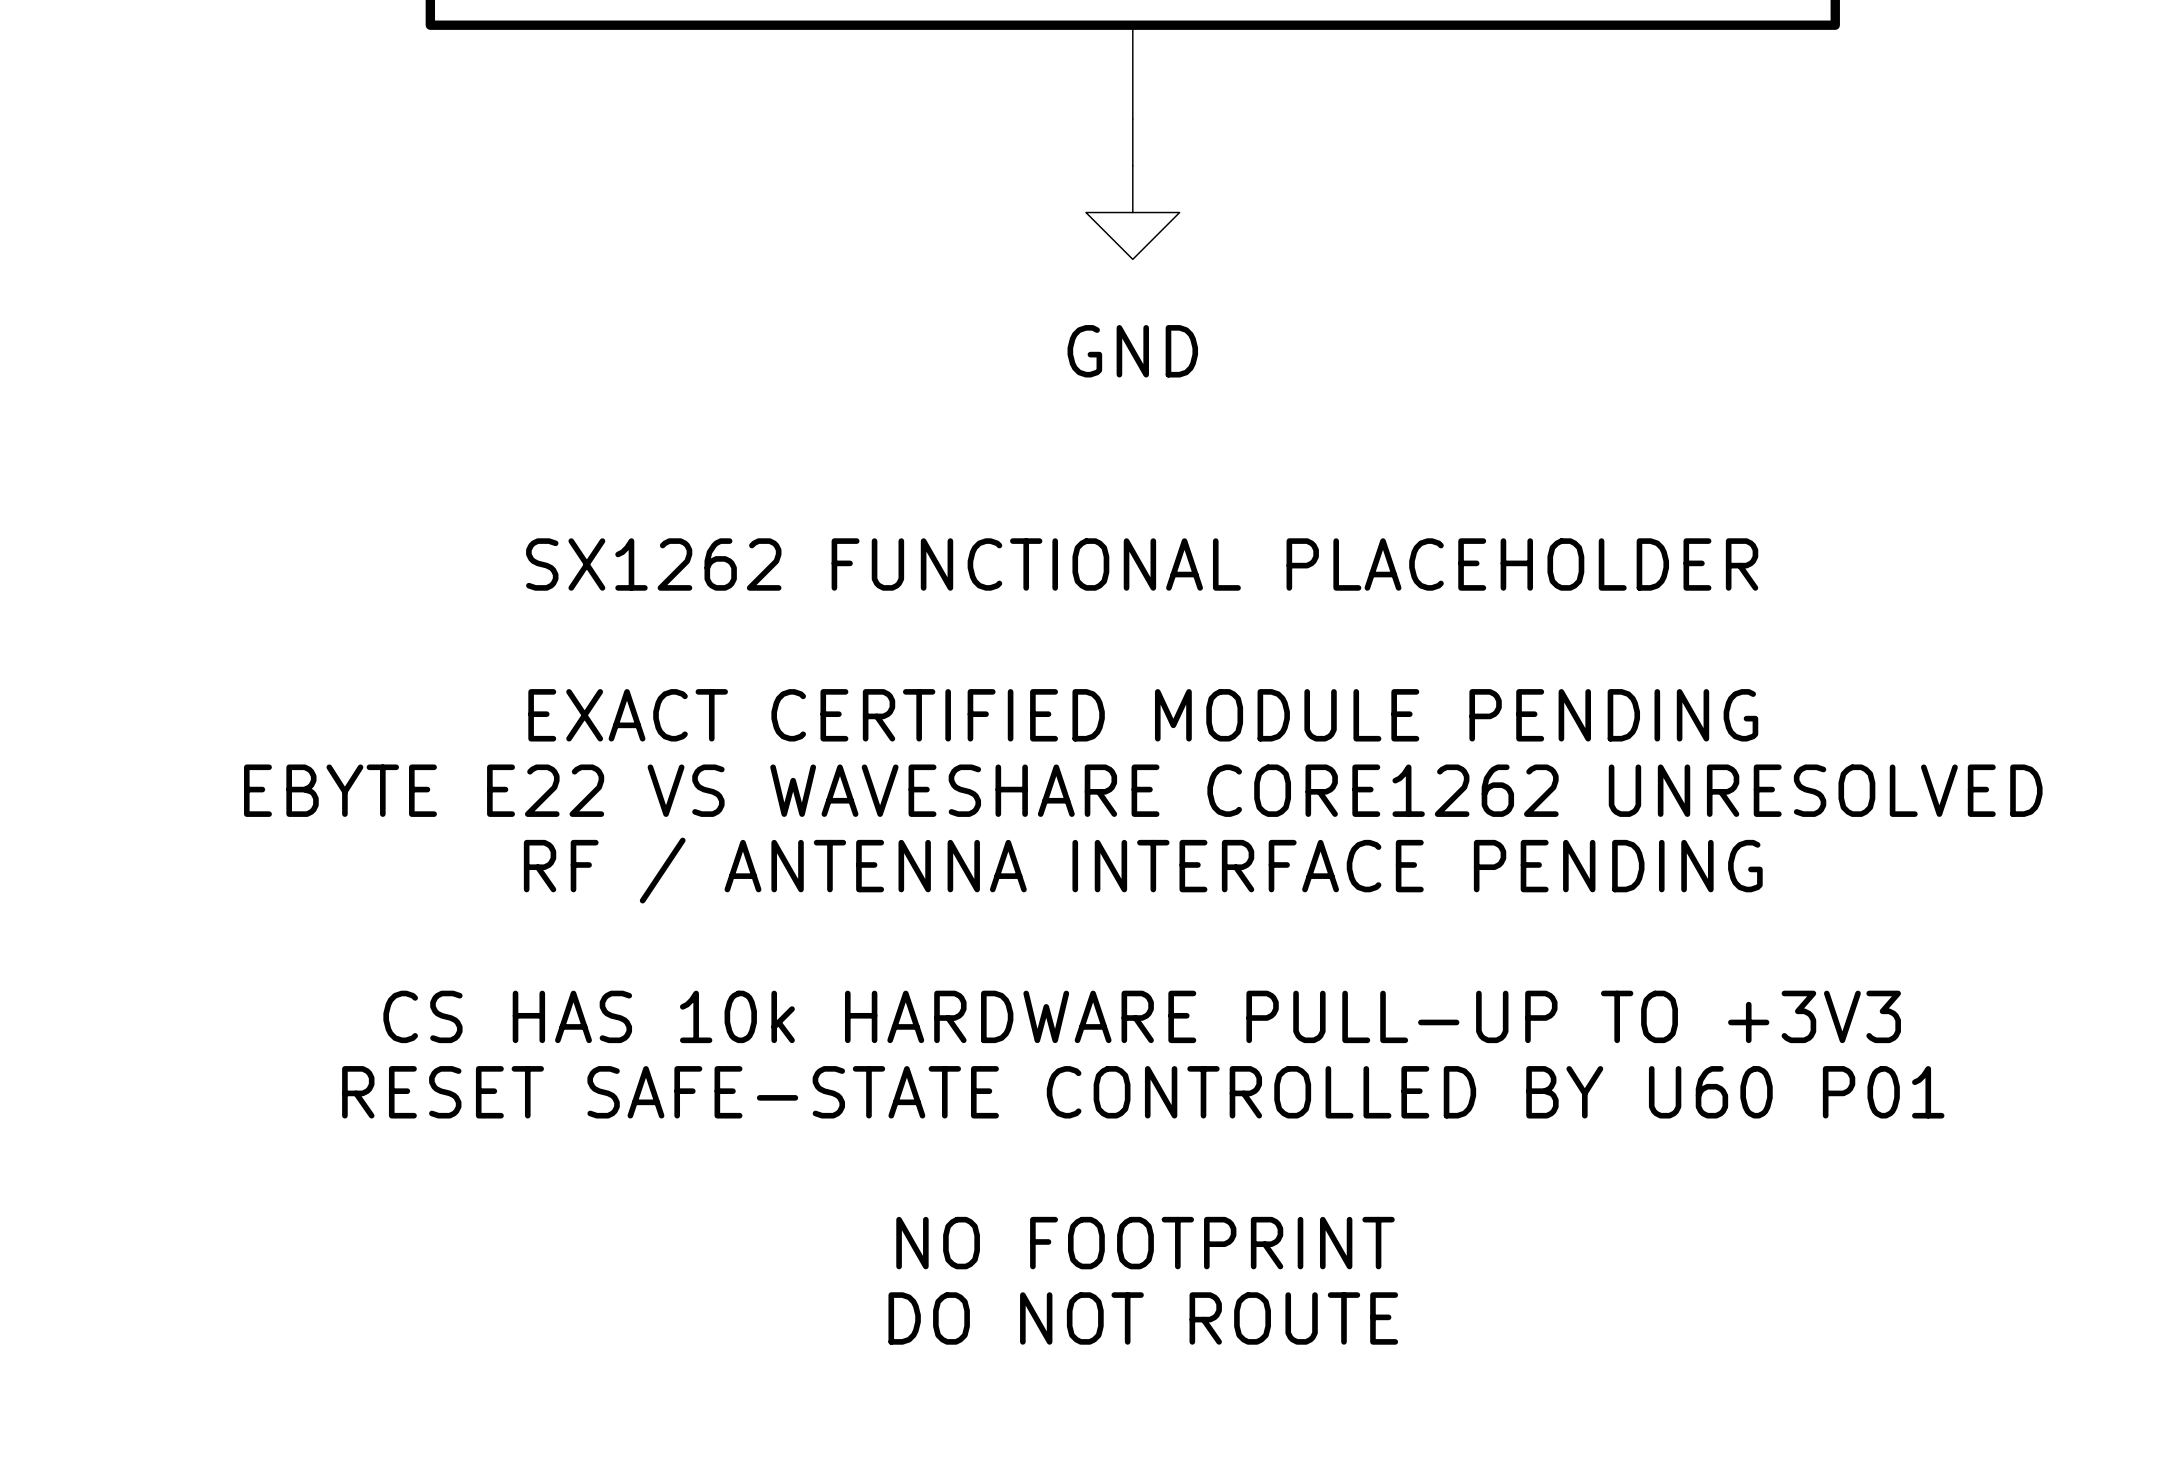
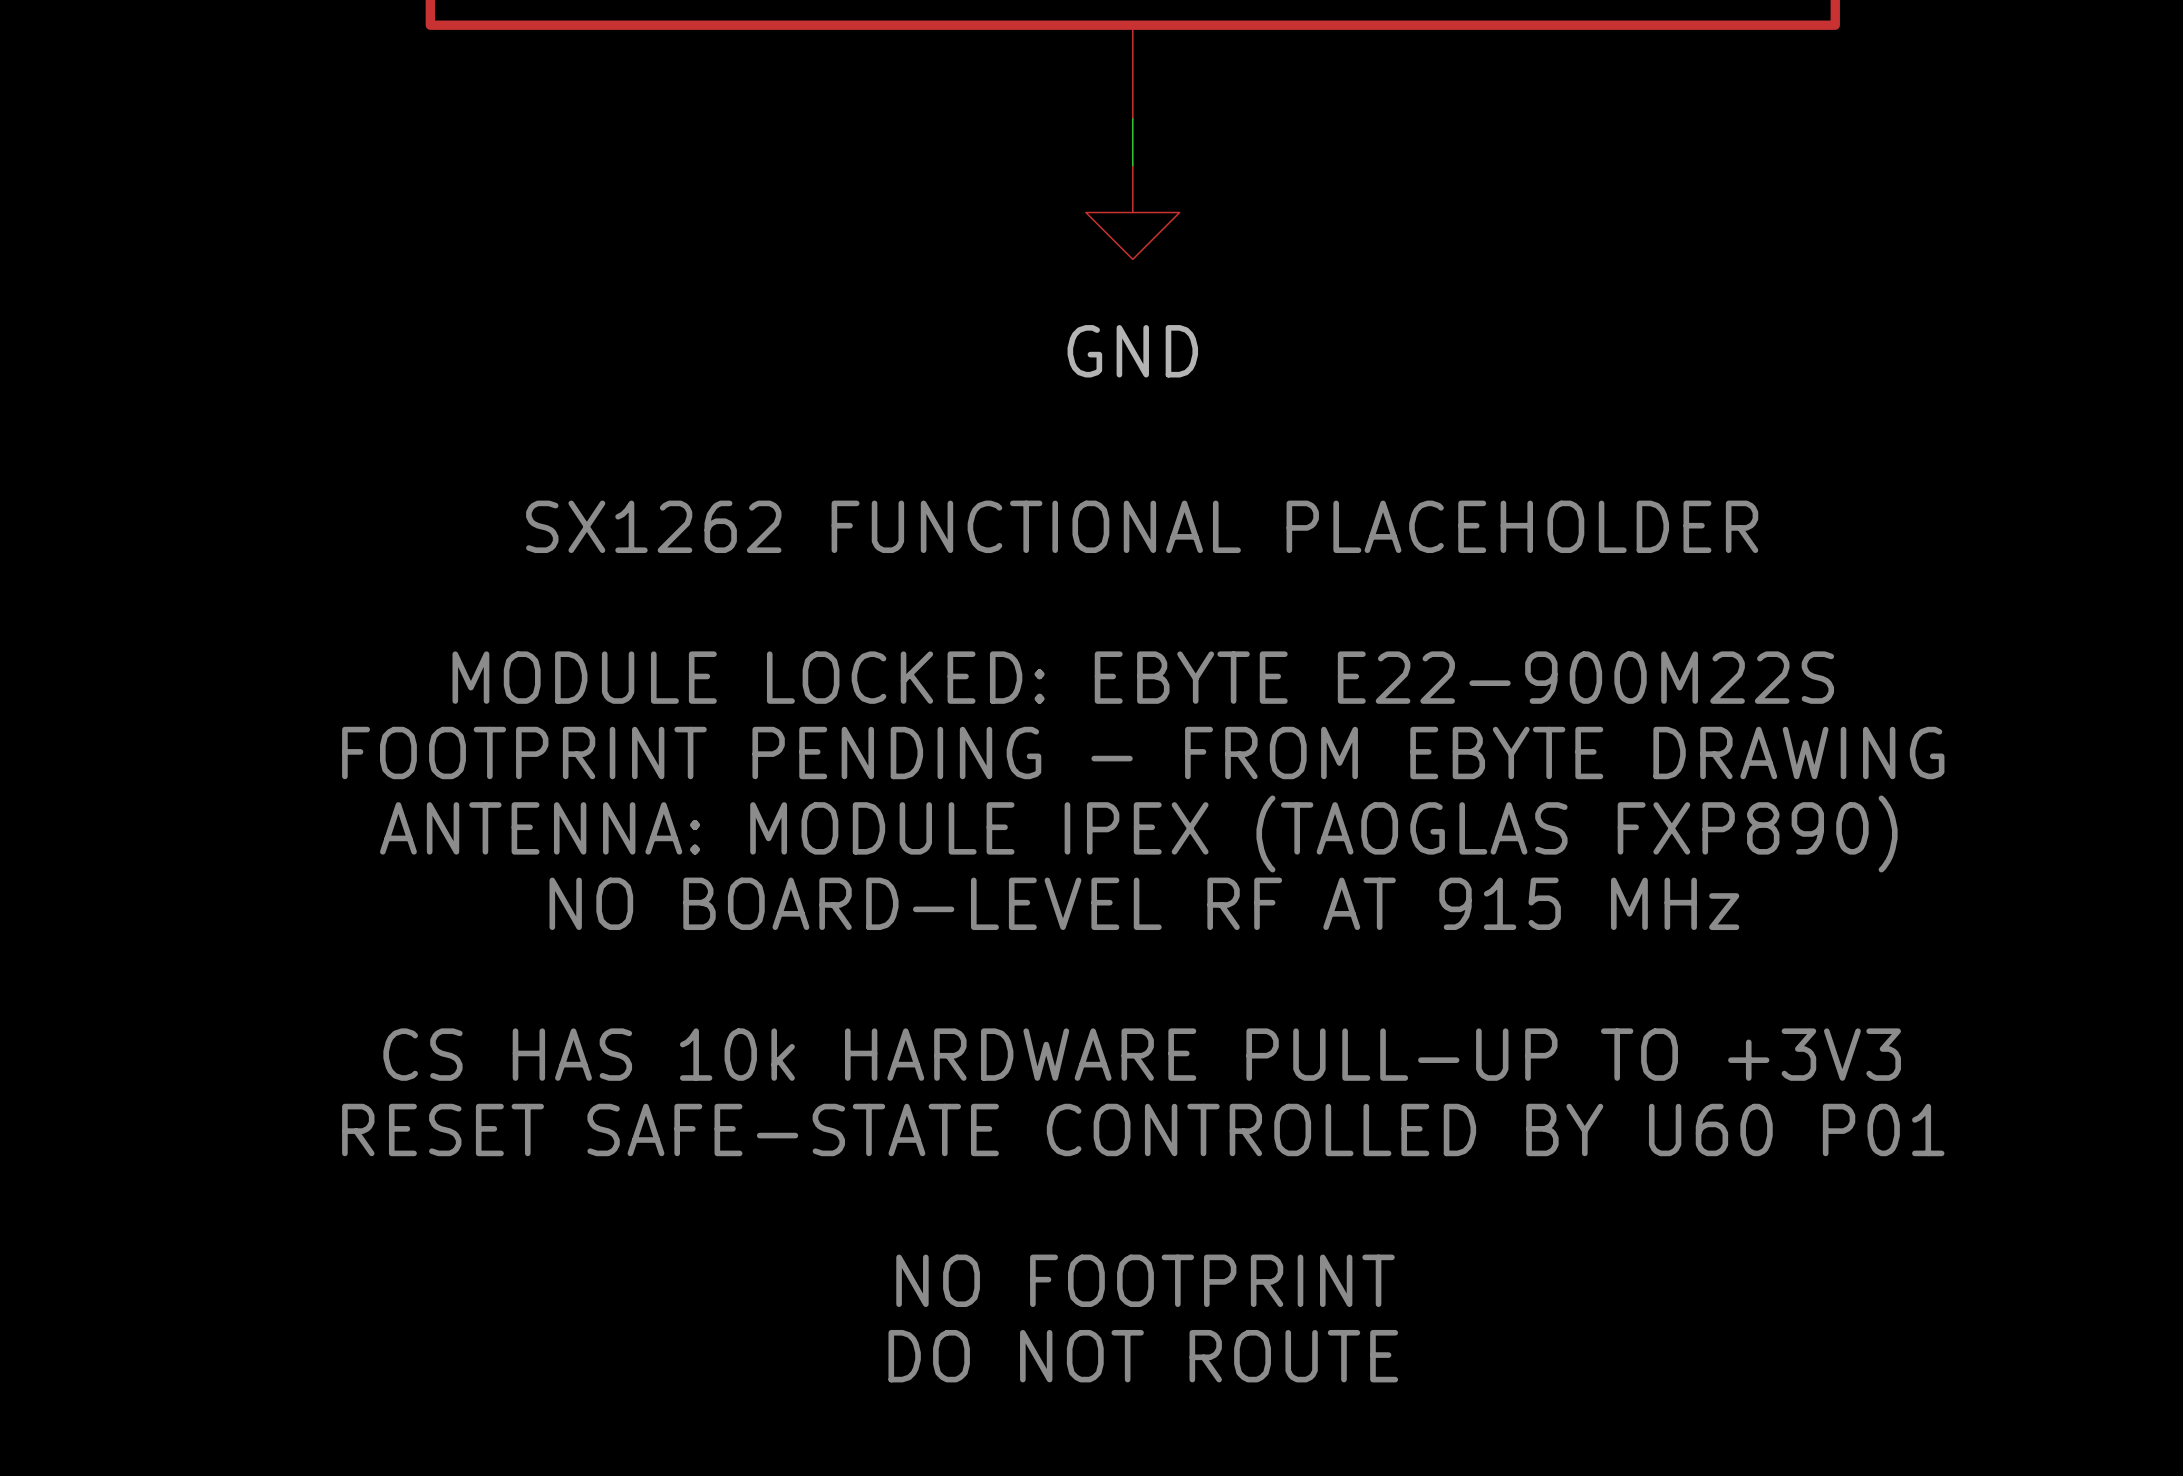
text position: SX1262 FUNCTIONAL PLACEHOLDER (1142, 564) -> SX1262 FUNCTIONAL PLACEHOLDER (1142, 526)
text: none -> MODULE LOCKED: EBYTE E22-900M22S (1143, 677)
text: EXACT CERTIFIED MODULE PENDING (1143, 715) -> none
text: none -> FOOTPRINT PENDING - FROM EBYTE DRAWING (1143, 753)
text: EBYTE E22 VS WAVESHARE CORE1262 UNRESOLVED (1143, 790) -> none
text: none -> ANTENNA: MODULE IPEX (TAOGLAS FXP890) (1138, 833)
text: RF / ANTENNA INTERFACE PENDING (1143, 870) -> none
text: none -> NO BOARD-LEVEL RF AT 915 MHz (1144, 903)
text position: CS HAS 10k HARDWARE PULL-UP TO +3V3 (1142, 1016) -> CS HAS 10k HARDWARE PULL-UP TO +3V3 (1142, 1054)
text position: RESET SAFE-STATE CONTROLLED BY U60 P01 (1143, 1092) -> RESET SAFE-STATE CONTROLLED BY U60 P01 (1143, 1129)
text position: NO FOOTPRINT (1145, 1243) -> NO FOOTPRINT (1145, 1280)
text position: DO NOT ROUTE (1143, 1318) -> DO NOT ROUTE (1143, 1356)

